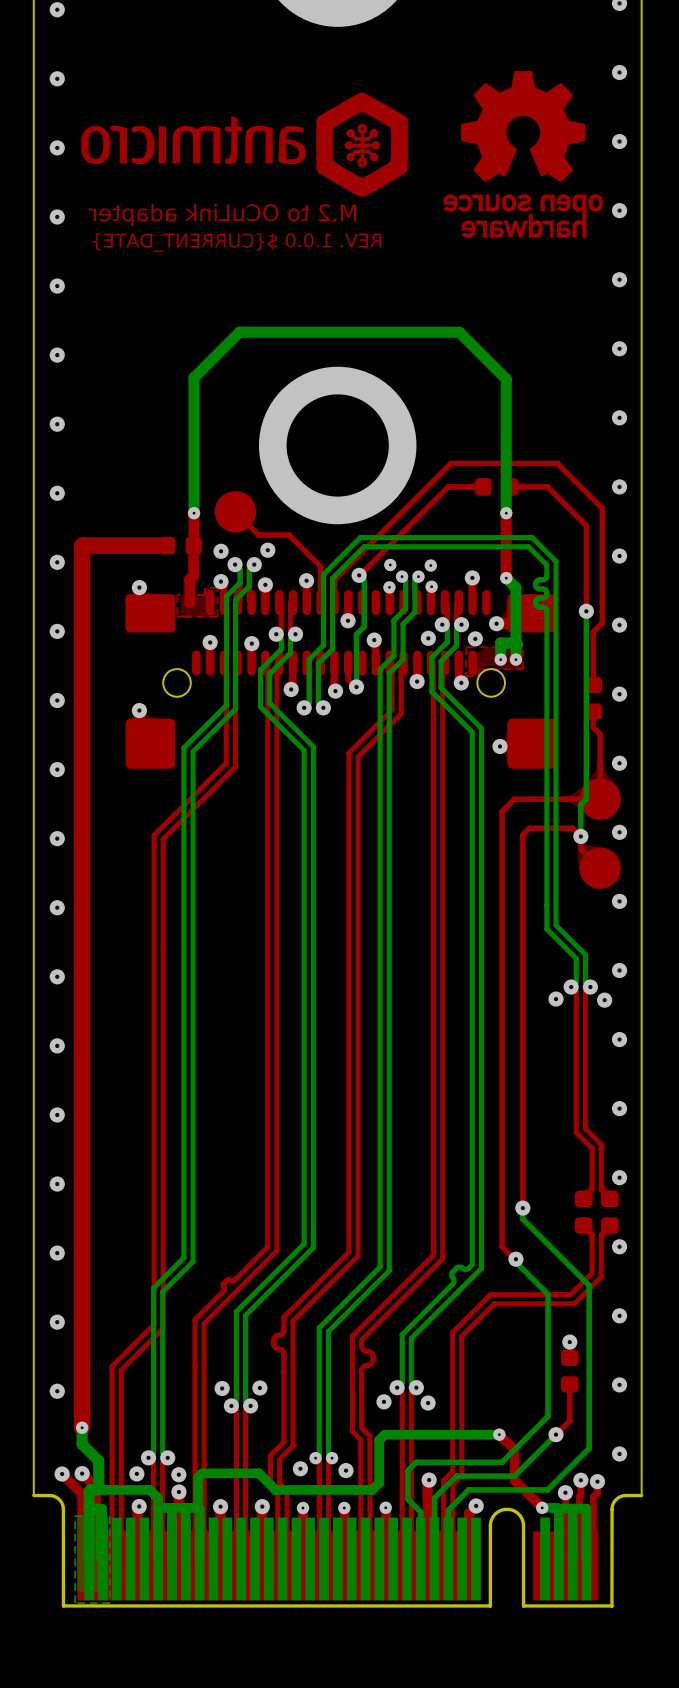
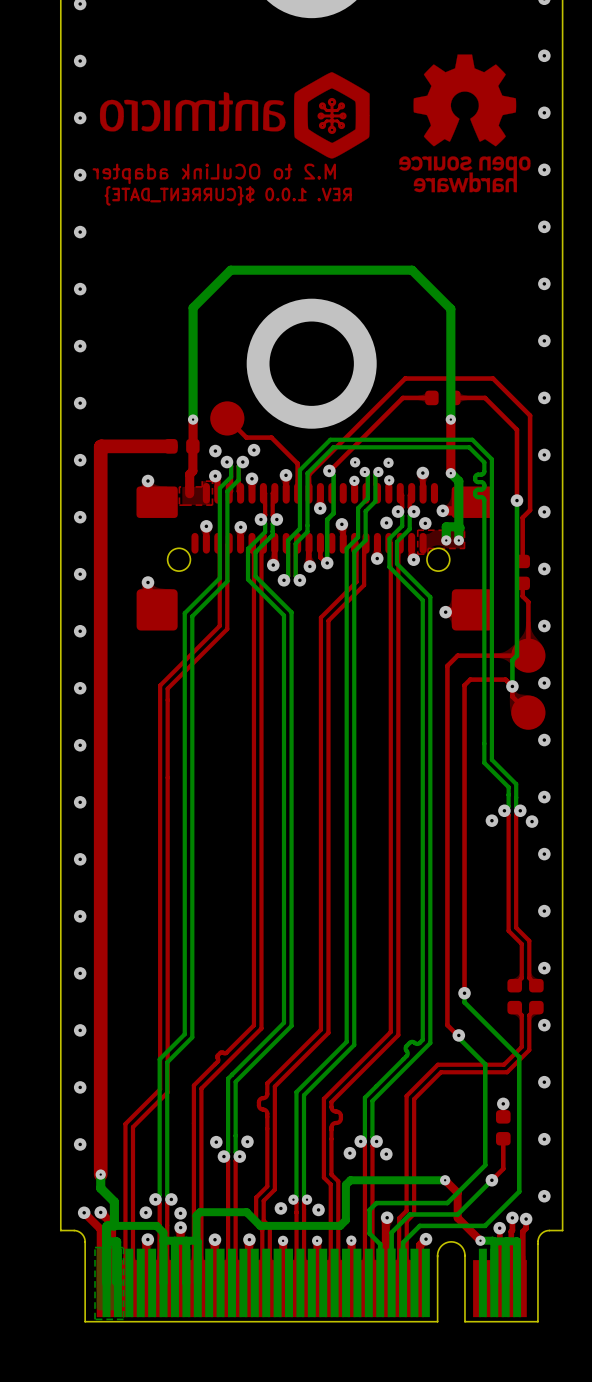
part footprint: [32, 1493, 644, 1608] -> [96, 1248, 527, 1318]
board edge: none -> (562, 1230) (545, 1231) (538, 1238) (537, 1321) (464, 1321) (464, 1253) (460, 1245) (451, 1241) (442, 1245) (437, 1253) (437, 1321) (85, 1321) (84, 1239) (77, 1231) (60, 1230)

